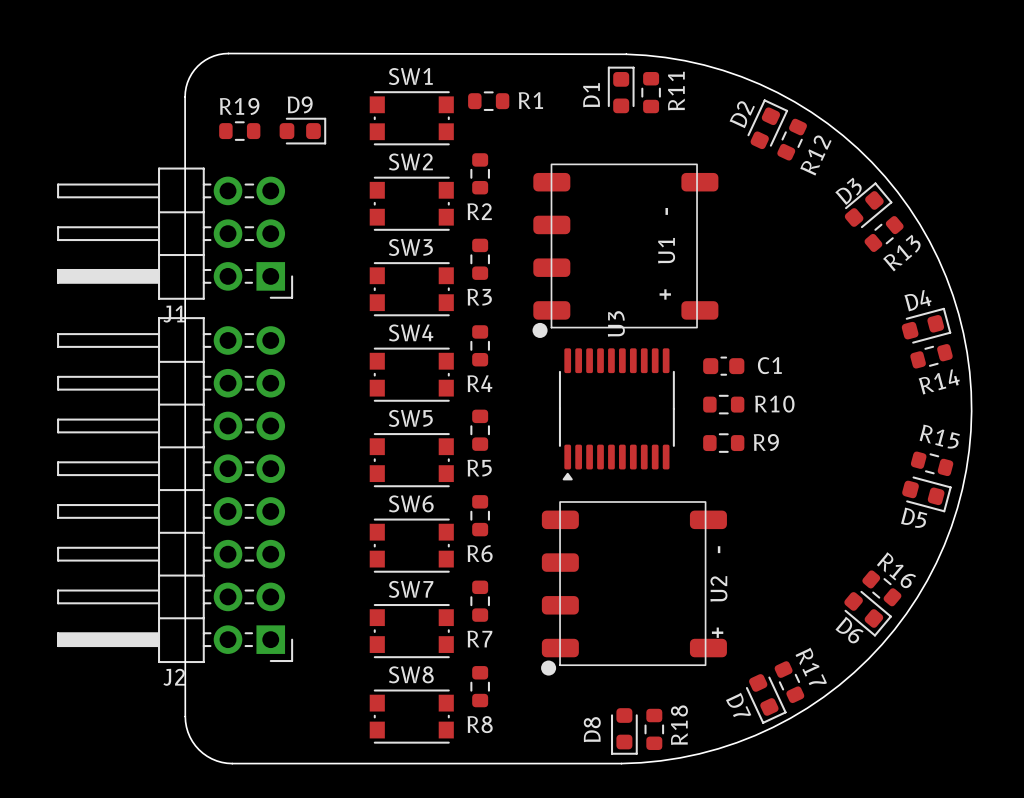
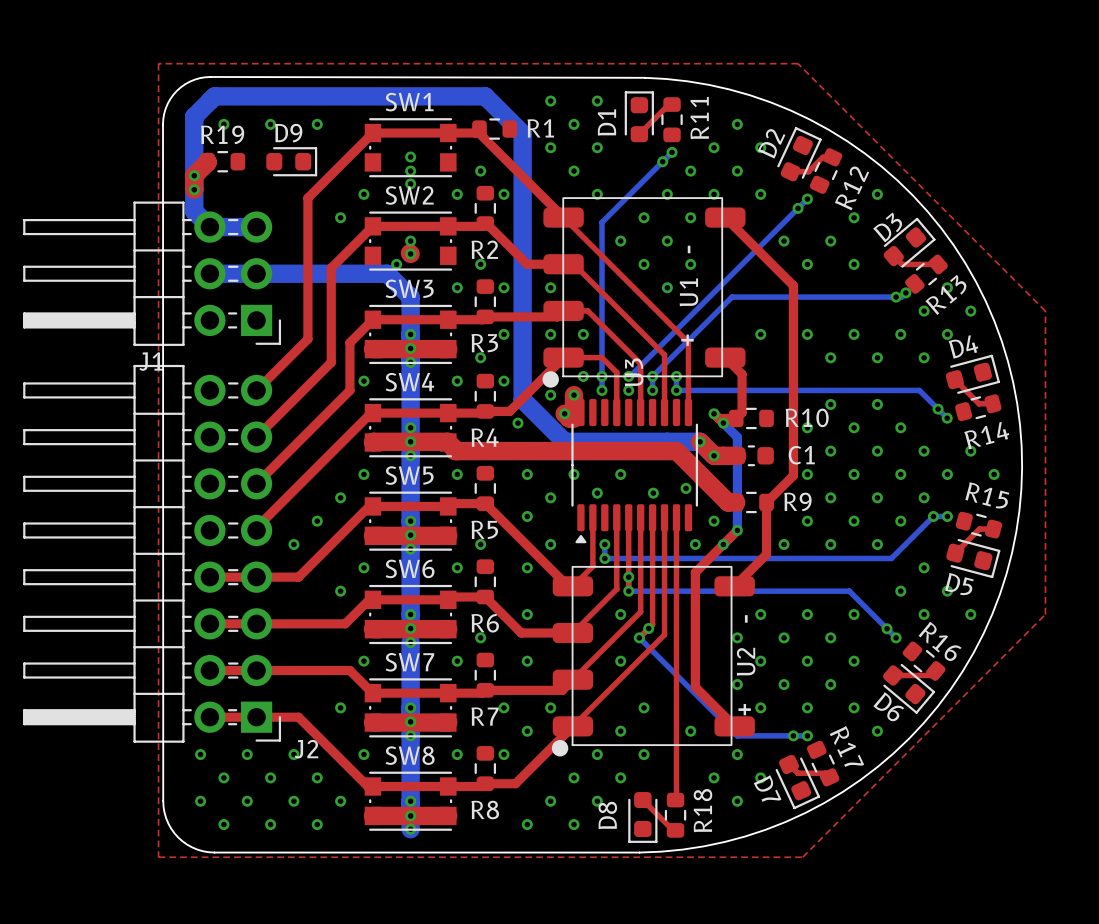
top zone outline: none -> (158, 63) (158, 857) (802, 857) (1045, 614) (1045, 311) (798, 63) (158, 63)
via: none -> (550, 101)
via: none -> (597, 101)
top track: none -> (672, 104) (668, 104) (639, 134)
via: none -> (223, 124)
via: none -> (270, 124)
via: none -> (317, 124)
via: none -> (574, 124)
via: none -> (737, 124)
via: none -> (550, 147)
via: none -> (597, 147)
via: none -> (714, 147)
via: none -> (760, 147)
bottom track: none -> (672, 152) (602, 222) (602, 390)
via: none -> (672, 152)
via: none -> (410, 157)
top track: none -> (832, 157) (822, 157) (808, 171) (790, 171)
top track: none -> (207, 161) (194, 175) (194, 189)
via: none -> (662, 161)
via: none -> (410, 171)
via: none -> (480, 171)
via: none -> (574, 171)
via: none -> (690, 171)
via: none -> (737, 171)
via: none -> (194, 175)
via: none -> (410, 183)
via: none -> (194, 189)
via: none -> (363, 194)
via: none -> (457, 194)
via: none -> (503, 194)
via: none -> (597, 194)
via: none -> (667, 194)
via: none -> (714, 194)
via: none -> (760, 194)
via: none -> (877, 194)
bottom track: none -> (807, 199) (628, 376)
via: none -> (807, 199)
via: none -> (798, 208)
via: none -> (340, 217)
via: none -> (644, 217)
via: none -> (690, 217)
top track: none -> (725, 217) (793, 285) (793, 475) (766, 502) (766, 554) (734, 586)
via: none -> (854, 217)
bottom track: none -> (256, 227) (209, 227) (194, 211) (194, 116) (214, 96) (485, 96) (522, 133) (522, 399) (564, 441) (700, 441) (714, 455)
via: none -> (410, 241)
via: none -> (620, 241)
via: none -> (667, 241)
via: none -> (784, 241)
via: none -> (830, 241)
top track: none -> (409, 253) (410, 253)
via: none -> (410, 253)
top track: none -> (893, 256) (902, 264) (938, 264)
via: none -> (396, 264)
via: none -> (480, 264)
via: none -> (644, 264)
via: none -> (690, 264)
via: none -> (807, 264)
via: none -> (854, 264)
bottom track: none -> (209, 273) (387, 273) (410, 297) (410, 628)
via: none -> (457, 287)
via: none -> (503, 287)
via: none -> (550, 287)
via: none -> (667, 287)
via: none -> (947, 287)
bottom track: none -> (905, 292) (901, 297) (731, 297) (652, 376) (652, 390)
via: none -> (905, 292)
via: none -> (896, 297)
via: none -> (924, 311)
via: none -> (970, 311)
via: none -> (410, 334)
via: none -> (503, 334)
via: none -> (550, 334)
via: none -> (583, 334)
via: none -> (760, 334)
via: none -> (807, 334)
via: none -> (854, 334)
via: none -> (900, 334)
via: none -> (947, 334)
top track: none -> (372, 349) (448, 349)
via: none -> (410, 348)
via: none -> (480, 357)
top track: none -> (725, 357) (742, 374) (742, 412) (736, 418) (718, 418)
via: none -> (830, 357)
via: none -> (877, 357)
via: none -> (924, 357)
via: none -> (410, 362)
via: none -> (583, 376)
via: none -> (602, 376)
via: none -> (628, 376)
via: none -> (652, 376)
bottom track: none -> (676, 376) (676, 390) (919, 390) (947, 418)
via: none -> (676, 376)
top track: none -> (954, 379) (979, 403) (992, 403)
via: none -> (363, 381)
via: none -> (457, 381)
via: none -> (503, 381)
top track: none -> (256, 390) (307, 339) (307, 198) (372, 133) (475, 133) (479, 129) (479, 133) (688, 342) (688, 412)
via: none -> (602, 390)
via: none -> (628, 390)
via: none -> (652, 390)
via: none -> (676, 390)
via: none -> (550, 395)
top track: none -> (574, 395) (574, 418) (569, 418) (564, 413)
via: none -> (574, 395)
via: none -> (830, 404)
via: none -> (877, 404)
via: none -> (938, 409)
top track: none -> (616, 412) (616, 372) (601, 357) (563, 357) (509, 411) (371, 413) (256, 527) (256, 530)
top track: none -> (640, 412) (640, 363) (587, 310) (563, 310) (557, 316) (485, 316) (482, 319) (372, 319) (349, 342) (349, 390) (256, 483)
top track: none -> (664, 412) (664, 354) (573, 264) (527, 264) (486, 223) (482, 226) (372, 226) (331, 268) (331, 362) (256, 437)
via: none -> (564, 413)
bottom track: none -> (714, 413) (737, 437) (737, 530) (723, 544)
via: none -> (714, 413)
via: none -> (947, 418)
C1 position: (723, 366) -> (751, 455)
via: none -> (517, 423)
via: none -> (723, 423)
via: none -> (410, 427)
via: none -> (807, 427)
via: none -> (854, 427)
via: none -> (900, 427)
via: none -> (410, 441)
top track: none -> (700, 441) (714, 455) (737, 455)
via: none -> (700, 441)
top track: none -> (372, 442) (447, 441) (456, 451)
top track: none -> (454, 451) (674, 451)
top track: none -> (676, 451) (728, 502) (736, 502)
via: none -> (830, 451)
via: none -> (877, 451)
via: none -> (924, 451)
via: none -> (970, 451)
via: none -> (410, 455)
via: none -> (714, 455)
R10 position: (723, 404) -> (751, 418)
via: none -> (363, 474)
via: none -> (457, 474)
via: none -> (527, 474)
via: none -> (574, 474)
via: none -> (620, 474)
via: none -> (807, 474)
via: none -> (854, 474)
via: none -> (900, 474)
via: none -> (947, 474)
via: none -> (994, 474)
via: none -> (686, 488)
via: none -> (597, 493)
via: none -> (653, 493)
via: none -> (340, 497)
via: none -> (550, 497)
via: none -> (830, 497)
via: none -> (877, 497)
via: none -> (924, 497)
via: none -> (527, 516)
via: none -> (933, 516)
bottom track: none -> (947, 516) (933, 516) (891, 558) (604, 558) (604, 544)
via: none -> (947, 516)
top track: none -> (592, 517) (592, 566) (572, 586) (568, 586) (485, 503) (451, 503) (448, 506) (369, 506) (298, 577) (209, 577)
top track: none -> (616, 517) (616, 589) (572, 633) (521, 633) (485, 596) (451, 596) (448, 599) (369, 599) (345, 623) (209, 623)
top track: none -> (628, 517) (628, 591)
top track: none -> (640, 517) (640, 611) (562, 690) (485, 690) (482, 693) (372, 693) (349, 670) (209, 670)
top track: none -> (652, 517) (652, 624) (639, 637)
top track: none -> (664, 517) (664, 634) (515, 783) (485, 783) (482, 786) (367, 786) (298, 717) (209, 717)
top track: none -> (676, 517) (675, 800)
via: none -> (317, 521)
via: none -> (410, 521)
via: none -> (714, 521)
via: none -> (807, 521)
via: none -> (854, 521)
via: none -> (900, 521)
top track: none -> (993, 529) (979, 529) (955, 553)
top track: none -> (737, 530) (695, 572) (695, 687) (734, 726)
via: none -> (737, 530)
via: none -> (410, 535)
top track: none -> (372, 535) (448, 535)
via: none -> (293, 544)
via: none -> (480, 544)
via: none -> (550, 544)
via: none -> (604, 544)
via: none -> (695, 544)
via: none -> (723, 544)
via: none -> (784, 544)
via: none -> (830, 544)
via: none -> (877, 544)
via: none -> (410, 549)
via: none -> (604, 558)
via: none -> (363, 567)
via: none -> (457, 567)
via: none -> (527, 567)
via: none -> (924, 567)
bottom track: none -> (628, 577) (628, 591) (849, 591) (896, 637)
via: none -> (628, 577)
via: none -> (340, 591)
via: none -> (628, 591)
via: none -> (900, 591)
via: none -> (947, 591)
via: none -> (410, 614)
via: none -> (527, 614)
via: none -> (620, 614)
via: none -> (760, 614)
via: none -> (807, 614)
via: none -> (854, 614)
via: none -> (924, 614)
via: none -> (970, 614)
via: none -> (410, 628)
bottom track: none -> (648, 628) (639, 637) (737, 735) (807, 735)
via: none -> (648, 628)
via: none -> (886, 628)
top track: none -> (372, 629) (448, 629)
via: none -> (480, 637)
via: none -> (639, 637)
via: none -> (737, 637)
via: none -> (784, 637)
via: none -> (830, 637)
via: none -> (896, 637)
bottom track: none -> (410, 642) (410, 829)
via: none -> (410, 642)
via: none -> (363, 661)
via: none -> (457, 661)
via: none -> (527, 661)
via: none -> (620, 661)
via: none -> (760, 661)
via: none -> (807, 661)
via: none -> (854, 661)
top track: none -> (935, 670) (931, 675) (893, 675)
via: none -> (737, 684)
via: none -> (784, 684)
via: none -> (830, 684)
via: none -> (340, 707)
via: none -> (410, 707)
via: none -> (503, 707)
via: none -> (550, 707)
via: none -> (644, 707)
via: none -> (760, 707)
via: none -> (807, 707)
via: none -> (854, 707)
via: none -> (410, 721)
top track: none -> (372, 722) (448, 722)
via: none -> (527, 731)
via: none -> (620, 731)
via: none -> (690, 731)
via: none -> (877, 731)
via: none -> (410, 735)
via: none -> (793, 735)
via: none -> (807, 735)
via: none -> (200, 754)
via: none -> (247, 754)
via: none -> (293, 754)
via: none -> (363, 754)
via: none -> (457, 754)
via: none -> (503, 754)
via: none -> (597, 754)
via: none -> (644, 754)
via: none -> (737, 754)
J2 name position: J2 (174, 677) -> J2 (306, 749)
top track: none -> (789, 764) (797, 773) (825, 773) (829, 777)
via: none -> (223, 777)
via: none -> (270, 777)
via: none -> (317, 777)
via: none -> (574, 777)
via: none -> (620, 777)
via: none -> (714, 777)
via: none -> (760, 777)
top track: none -> (642, 800) (673, 830) (675, 830)
via: none -> (200, 801)
via: none -> (247, 801)
via: none -> (293, 801)
via: none -> (340, 801)
via: none -> (410, 801)
via: none -> (550, 801)
via: none -> (597, 801)
via: none -> (737, 801)
top track: none -> (372, 815) (448, 815)
via: none -> (410, 815)
via: none -> (223, 824)
via: none -> (270, 824)
via: none -> (317, 824)
via: none -> (527, 824)
via: none -> (574, 824)
via: none -> (410, 829)

